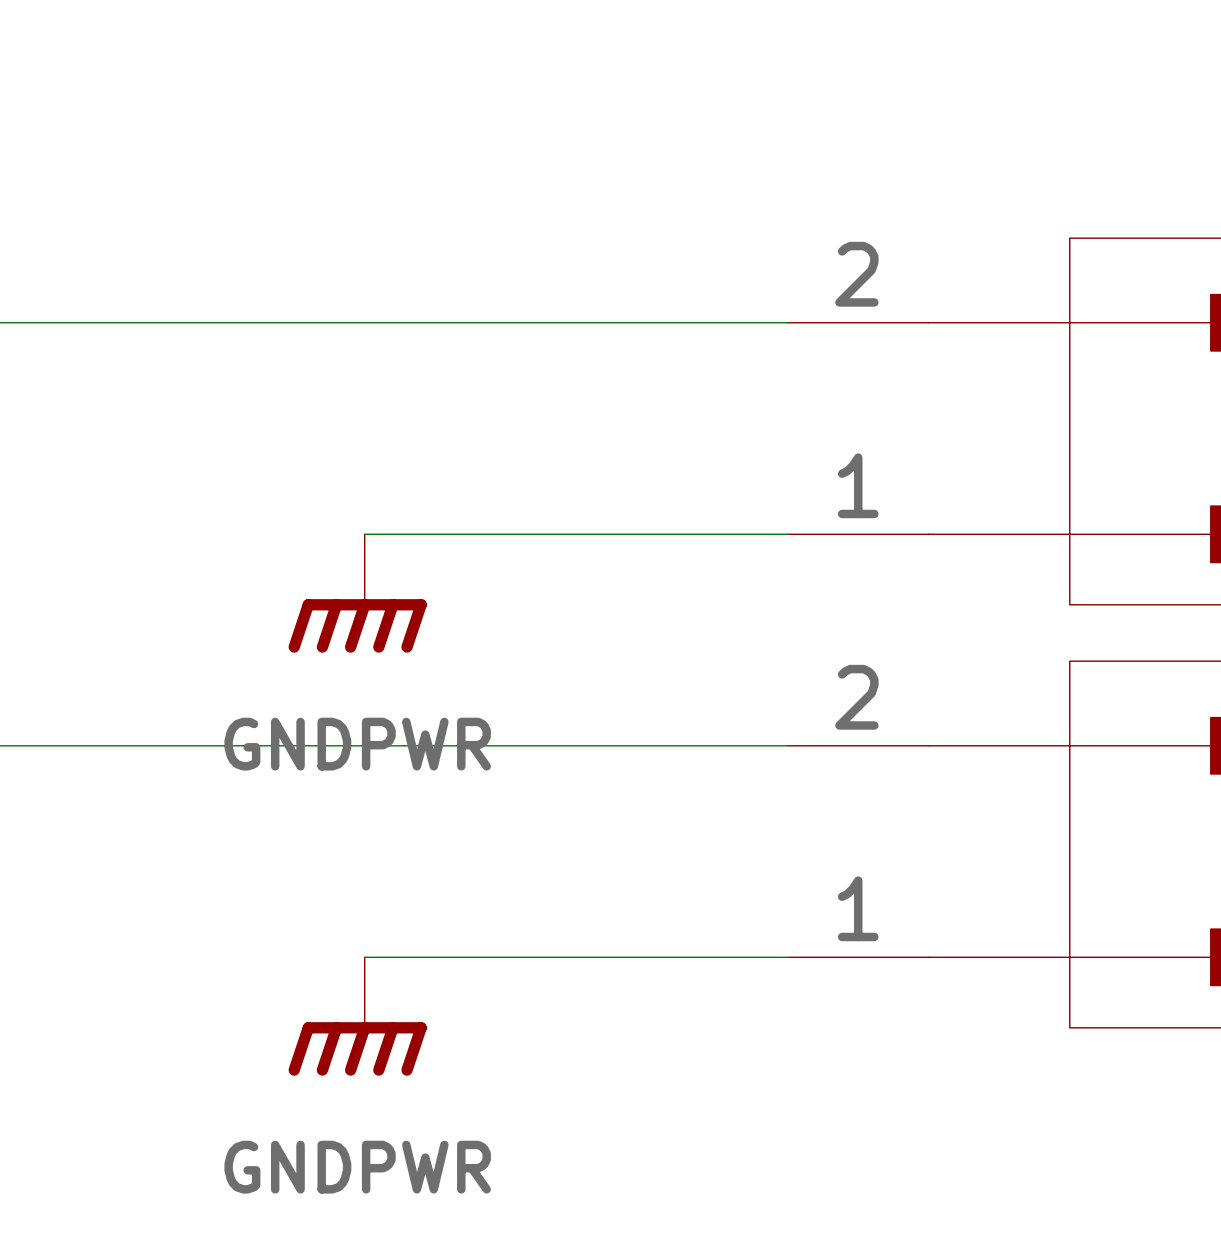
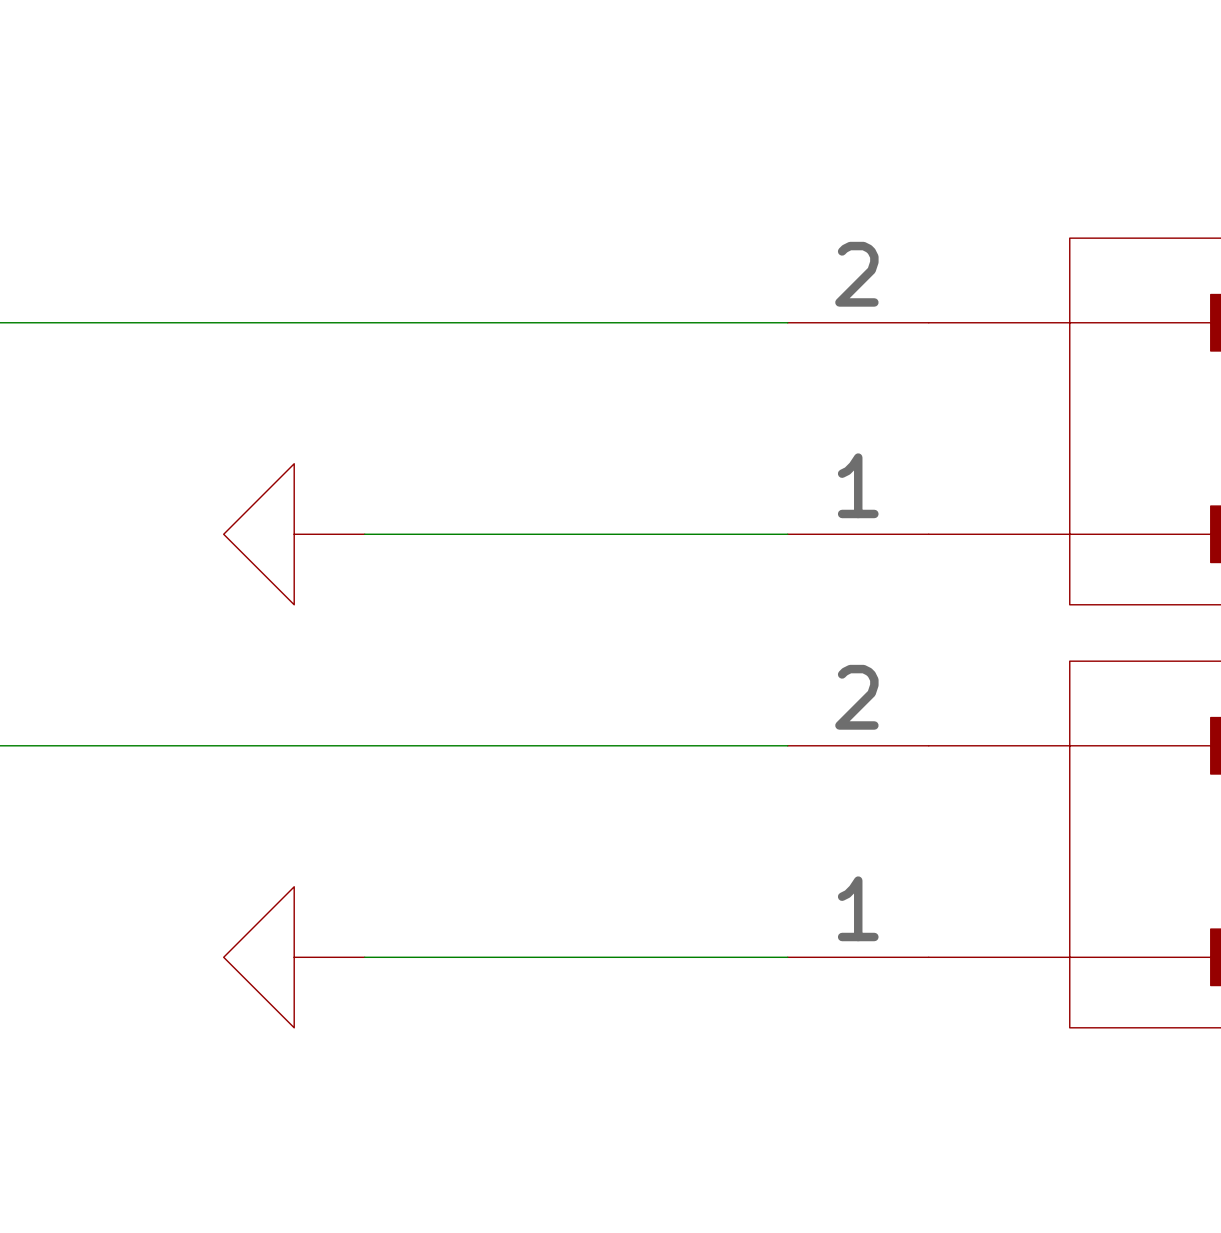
power symbol: none -> (294, 534)
power symbol: GNDPWR (357, 593) -> none
power symbol: none -> (294, 957)
power symbol: GNDPWR (357, 1016) -> none

